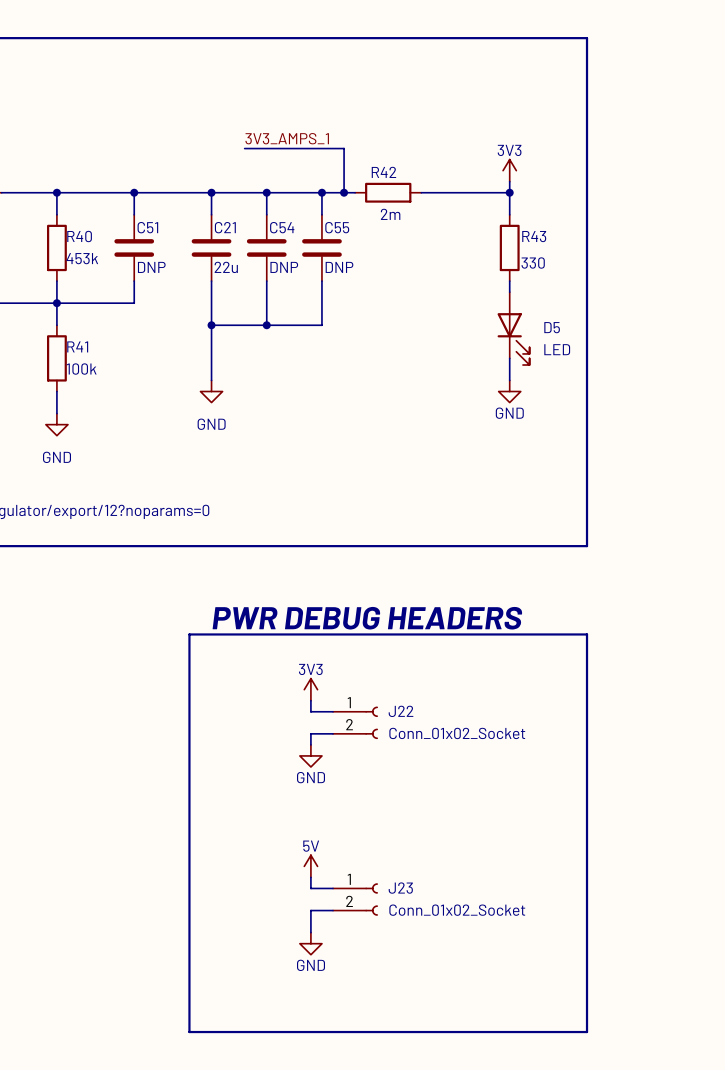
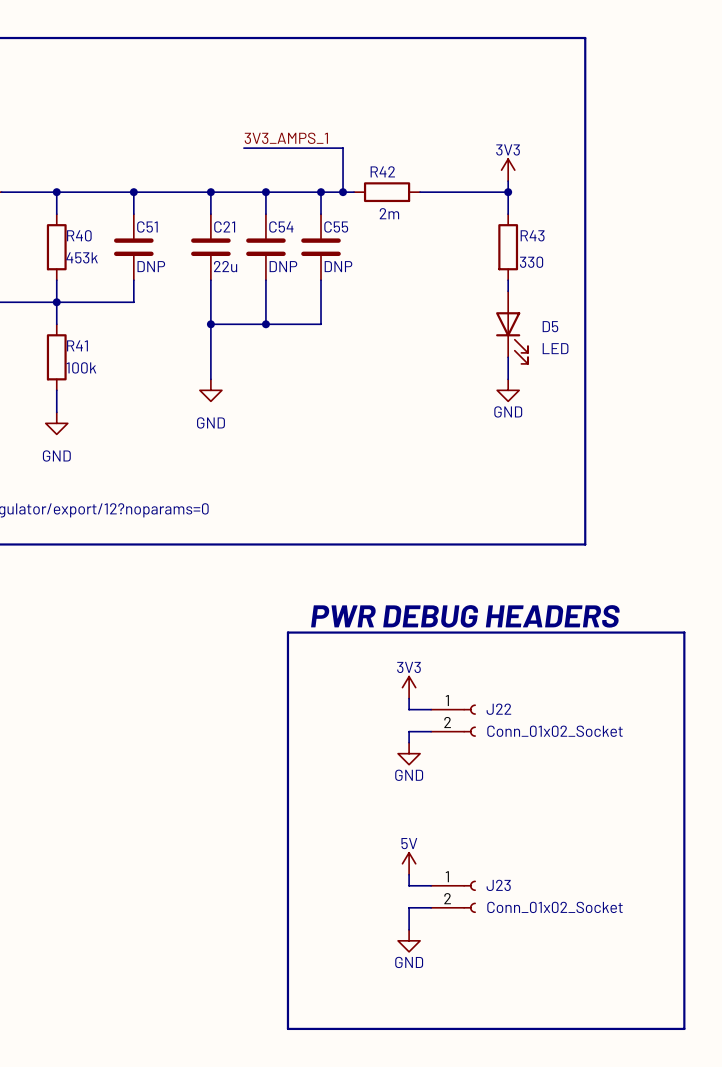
text position: PWR DEBUG HEADERS (367, 618) -> PWR DEBUG HEADERS (465, 616)
line: (288, 634) (189, 634) (189, 1032) (288, 1032) -> (287, 632) (287, 1028)
line: (587, 634) (587, 1032) -> (585, 632) (684, 632) (684, 1028) (585, 1028)
power symbol position: 3V3 (310, 689) -> 3V3 (409, 687)
wire: (310, 700) (310, 711) (333, 711) -> (409, 698) (409, 709) (431, 709)
J22 position: (355, 722) -> (453, 720)
wire: (333, 733) (310, 733) (310, 744) -> (431, 731) (409, 731) (409, 742)
power symbol position: GND (310, 755) -> GND (409, 753)
power symbol position: 5V (310, 866) -> 5V (409, 863)
wire: (310, 877) (310, 888) (333, 888) -> (409, 874) (409, 885) (431, 885)
J23 position: (355, 899) -> (453, 896)
wire: (333, 910) (310, 910) (310, 932) -> (431, 907) (409, 907) (409, 929)
power symbol position: GND (310, 943) -> GND (409, 940)

